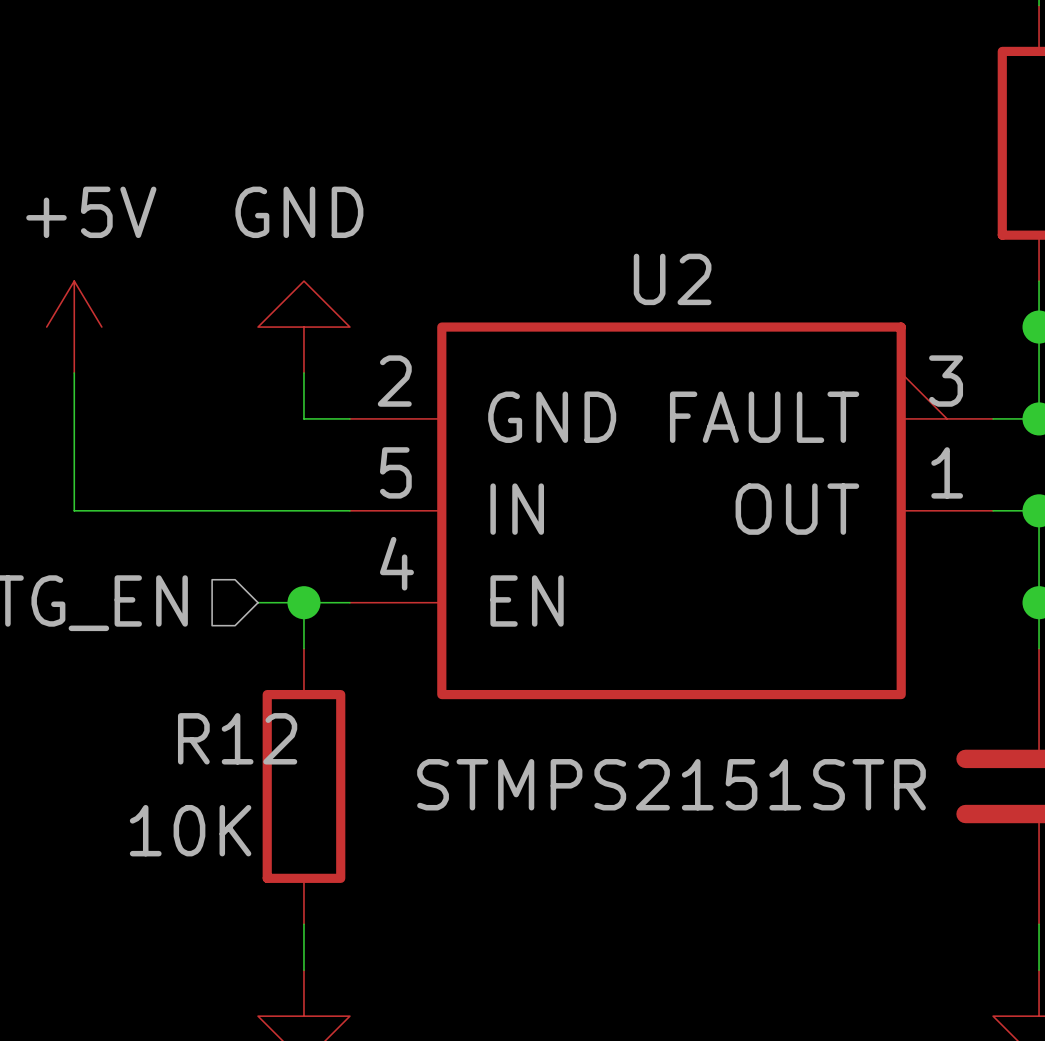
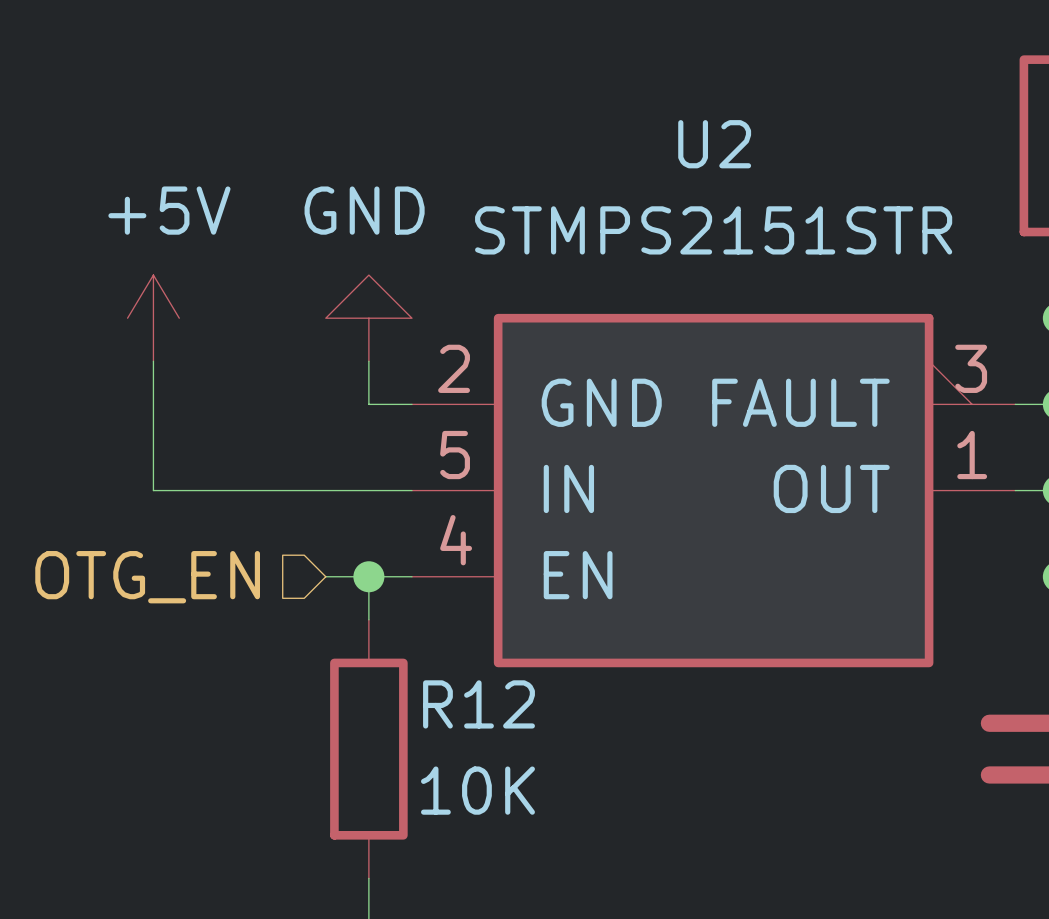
U2 name position: U2 (672, 279) -> U2 (714, 144)
R12 name position: R12 (237, 738) -> R12 (479, 704)
U2 value position: STMPS2151STR (671, 784) -> STMPS2151STR (713, 230)
R12 value position: 10K (190, 830) -> 10K (477, 790)

